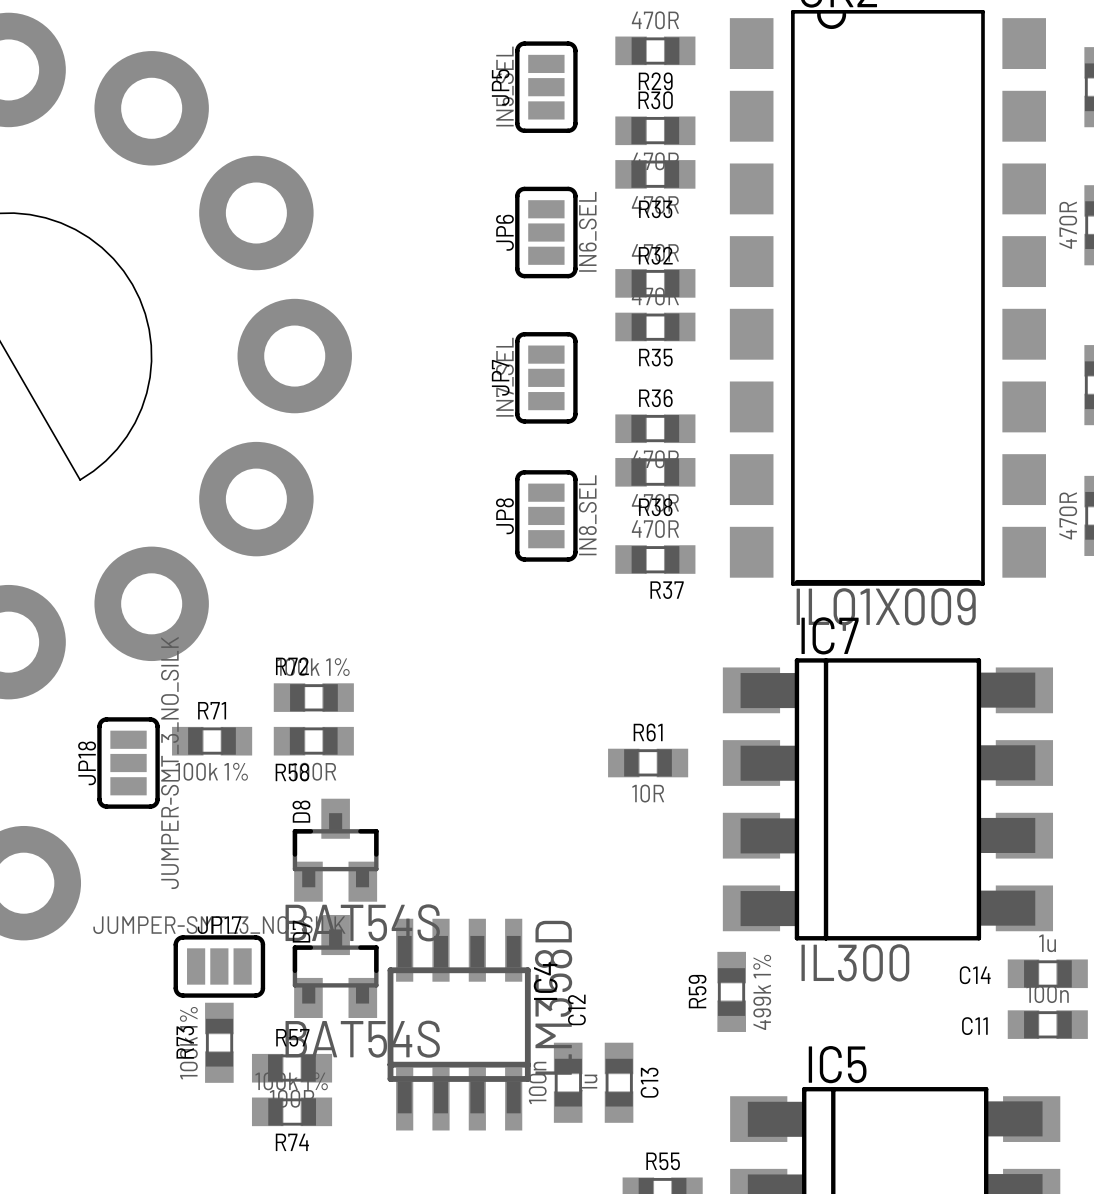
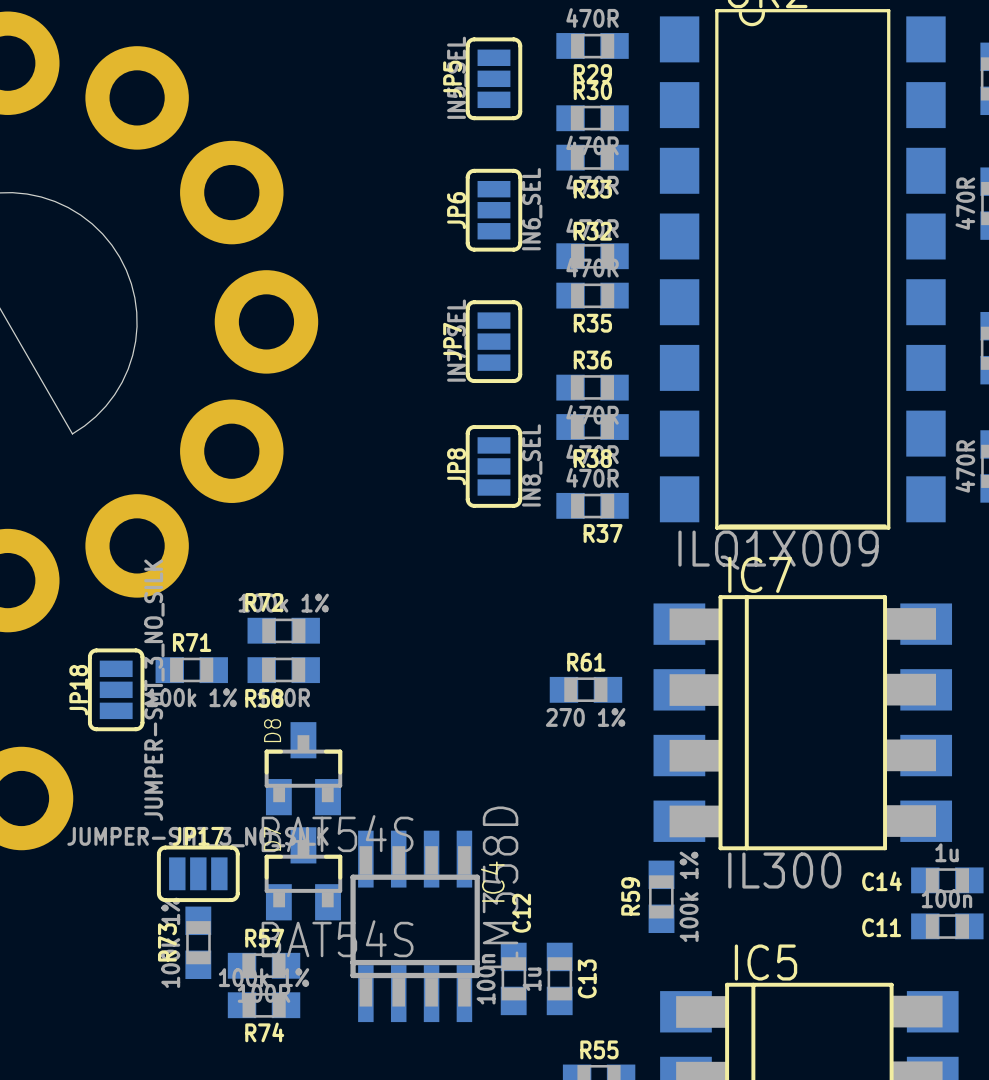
R61 value: 10R (648, 793) -> 270 1% (585, 717)
R59 value: 499k 1% (762, 992) -> 100k 1% (689, 896)

